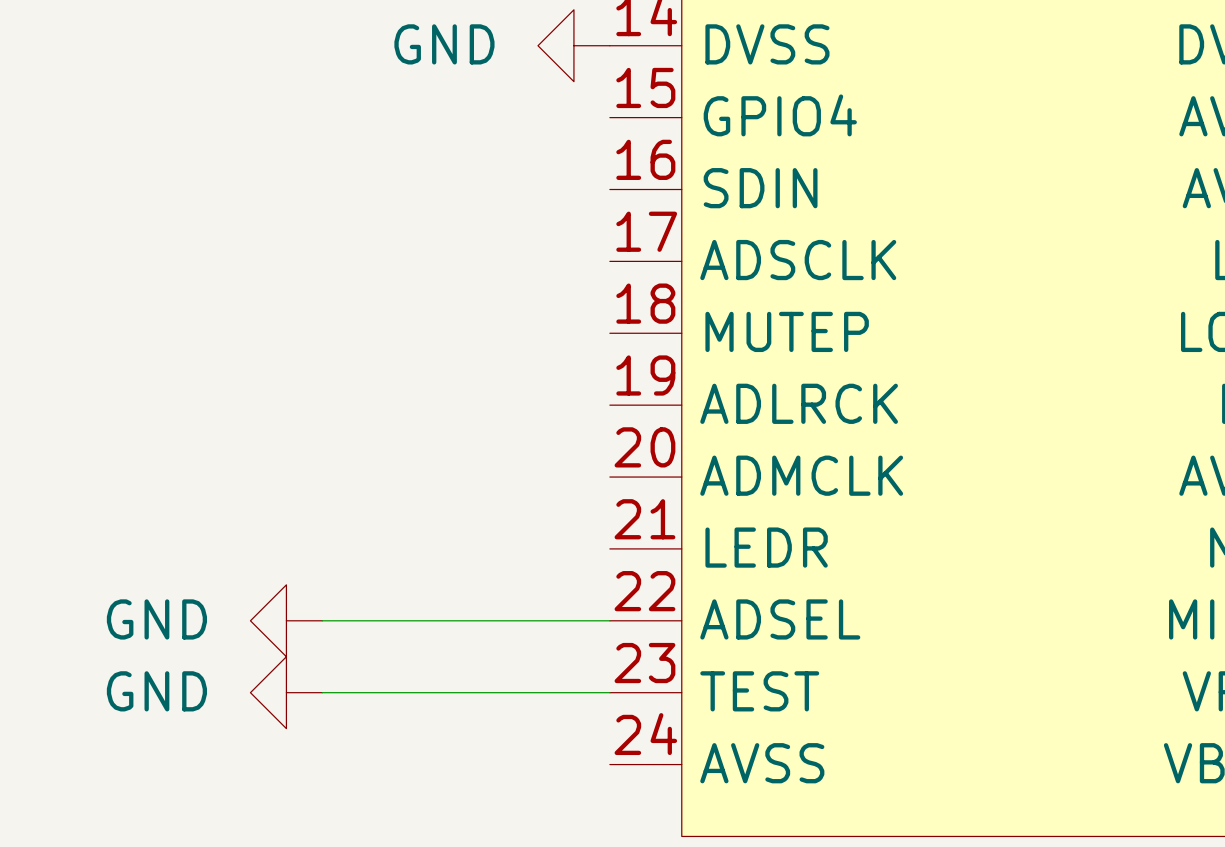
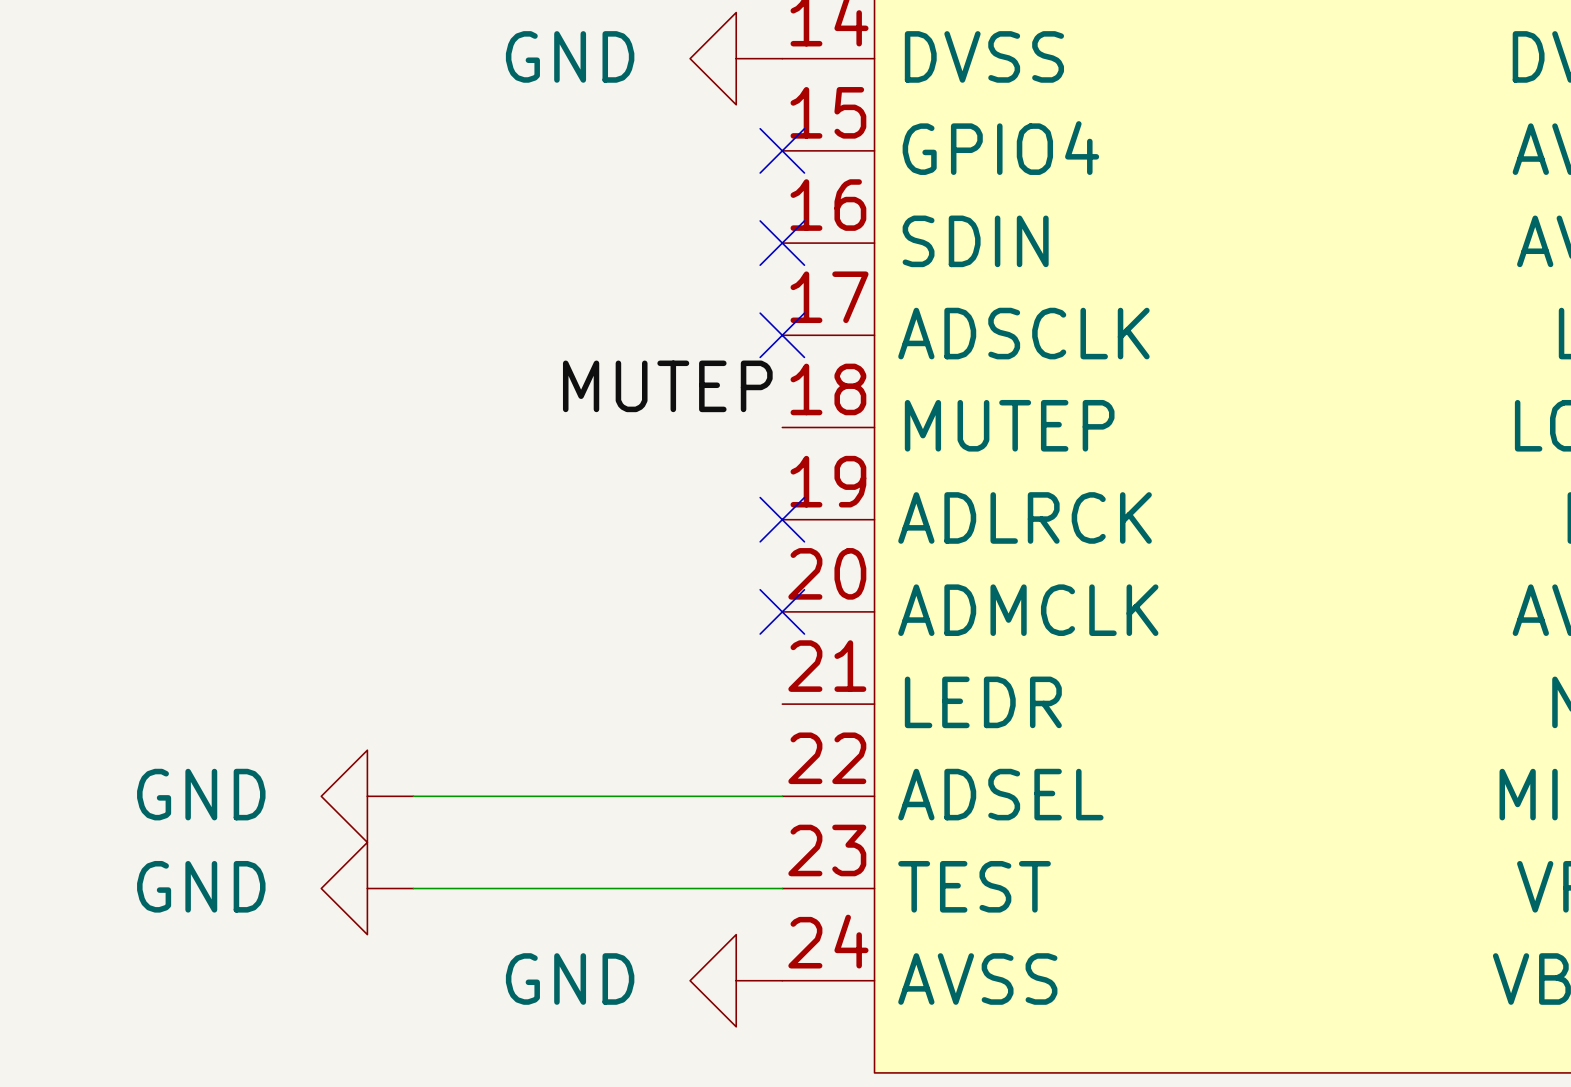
no-connect mark: none -> (782, 150)
no-connect mark: none -> (782, 243)
no-connect mark: none -> (782, 335)
label: none -> MUTEP (667, 386)
no-connect mark: none -> (782, 519)
no-connect mark: none -> (782, 611)
power symbol: none -> GND (736, 980)

